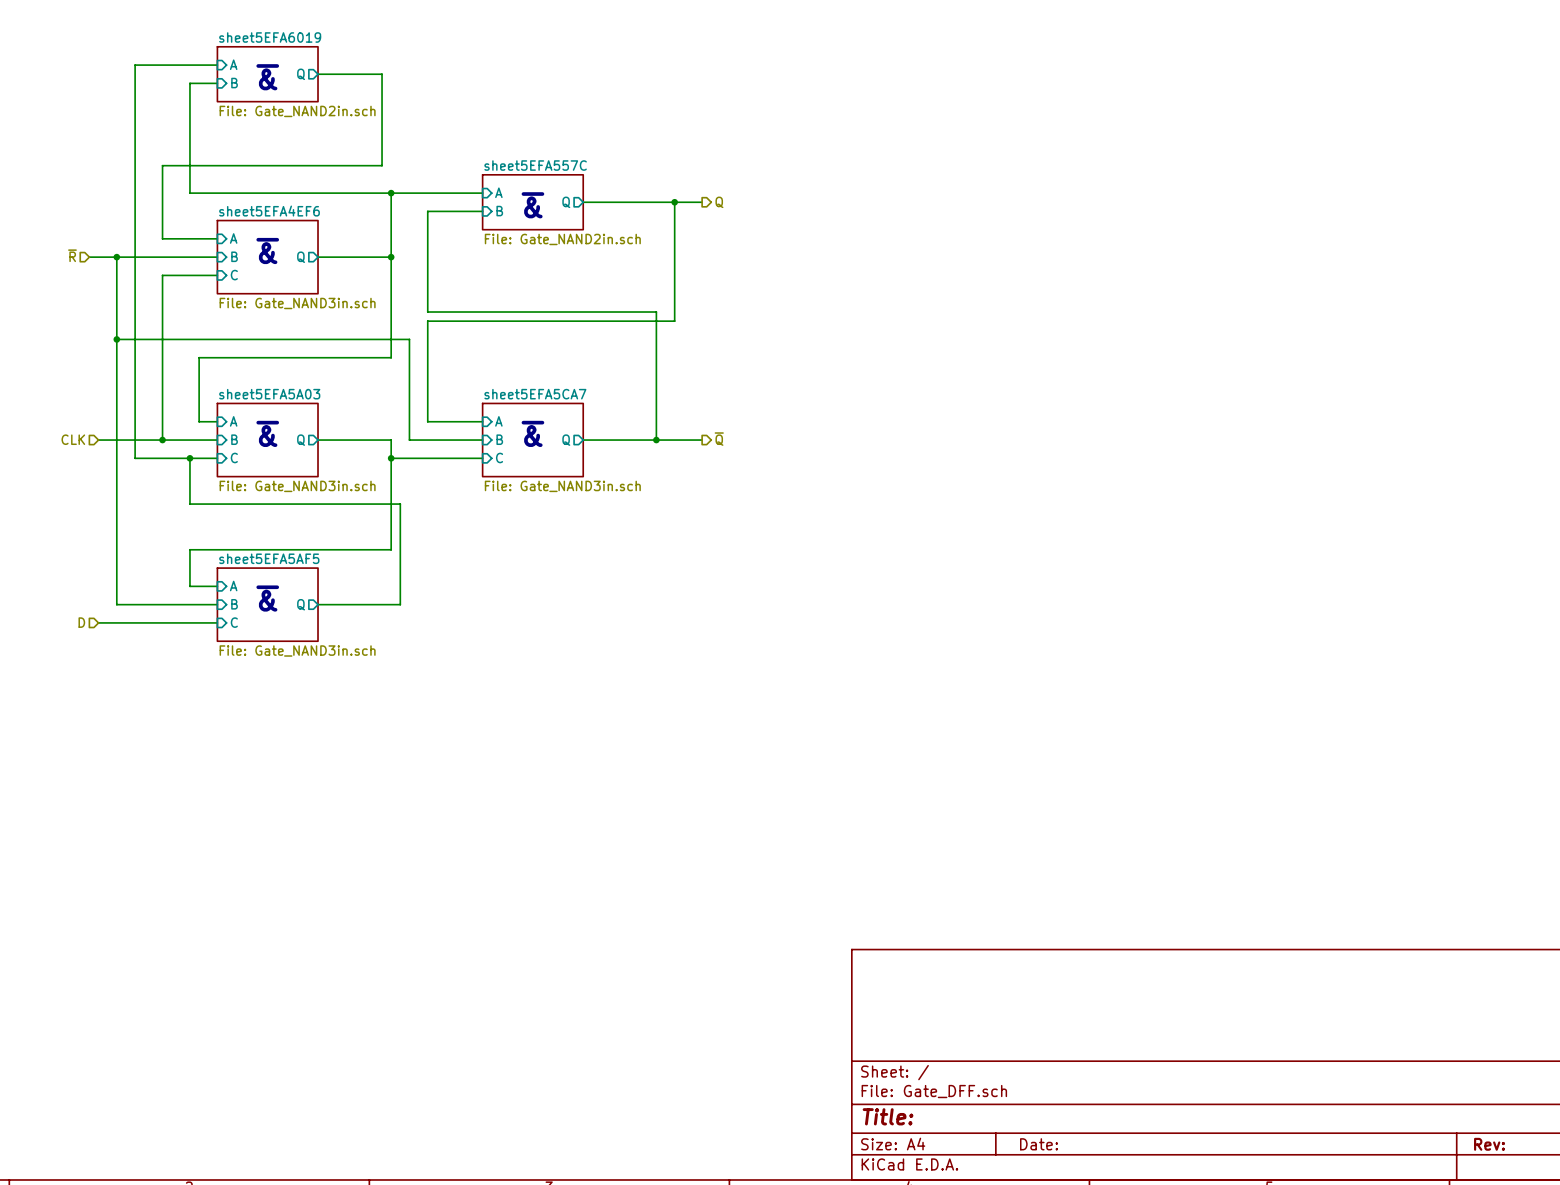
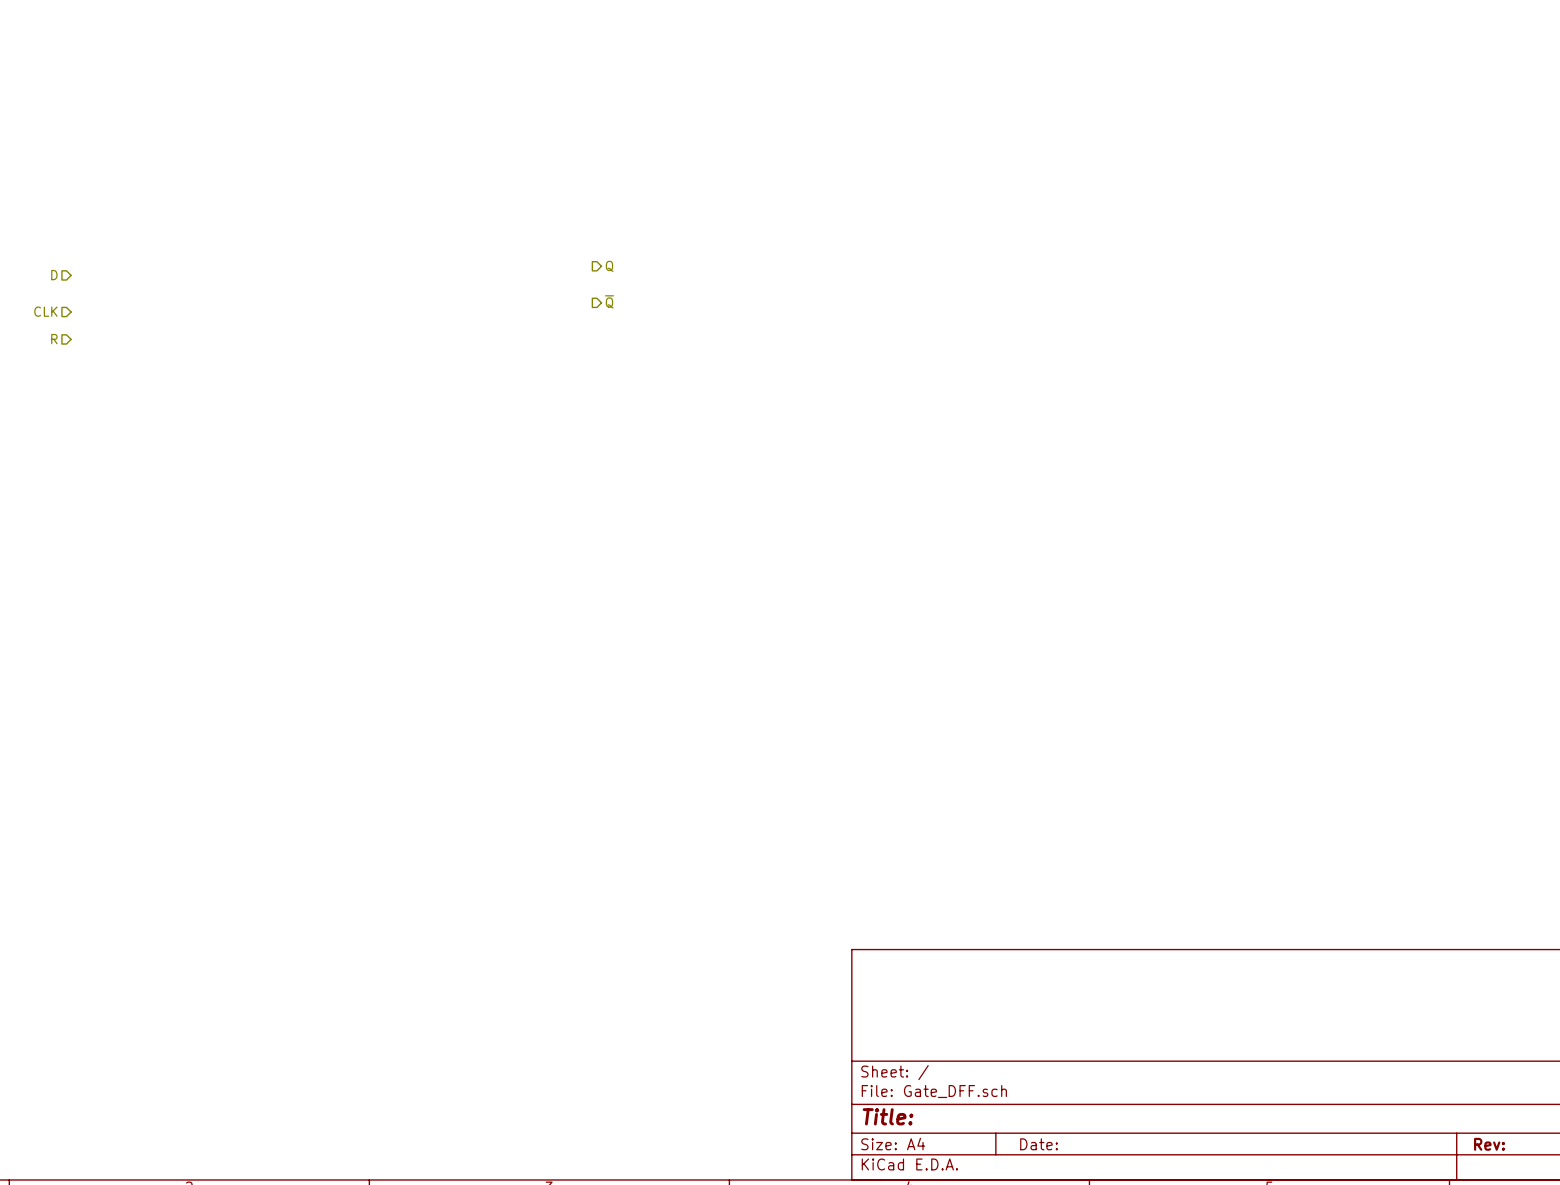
sheet pin: A (233, 64) -> none
wire: (217, 65) (135, 65) (135, 458) (217, 458) -> none
sheet sheet5EFA6019: File: Gate_NAND2in.sch (267, 74) -> none
sheet pin: Q (301, 74) -> none
wire: (318, 74) (382, 74) (382, 165) (162, 165) (162, 238) (217, 238) -> none
text: ~{&} (267, 77) -> none
wire: (217, 83) (189, 83) (189, 193) (482, 193) -> none
sheet pin: B (234, 83) -> none
sheet pin: A (498, 192) -> none
wire: (391, 193) (391, 357) (199, 357) (199, 421) (217, 421) -> none
junction: (391, 193) -> none
sheet sheet5EFA557C: File: Gate_NAND2in.sch (532, 202) -> none
sheet pin: Q (566, 202) -> none
wire: (583, 202) (702, 202) -> none
wire: (674, 202) (674, 321) (427, 321) (427, 421) (482, 421) -> none
junction: (674, 202) -> none
hierarchical label position: Q (719, 202) -> Q (609, 266)
text: ~{&} (532, 205) -> none
wire: (482, 211) (427, 211) (427, 312) (656, 312) (656, 440) -> none
sheet pin: B (499, 211) -> none
sheet pin: A (233, 238) -> none
text: ~{&} (267, 250) -> none
hierarchical label: ~{R} (72, 255) -> none
sheet pin: B (234, 256) -> none
wire: (89, 257) (217, 257) -> none
wire: (116, 257) (116, 604) (217, 604) -> none
junction: (116, 257) -> none
sheet sheet5EFA4EF6: File: Gate_NAND3in.sch (267, 257) -> none
sheet pin: Q (301, 257) -> none
wire: (318, 257) (391, 257) -> none
junction: (391, 257) -> none
hierarchical label: none -> D (54, 275)
wire: (217, 275) (162, 275) (162, 440) -> none
sheet pin: C (234, 275) -> none
hierarchical label: none -> R (54, 339)
wire: (116, 339) (409, 339) (409, 440) (482, 440) -> none
junction: (116, 339) -> none
sheet pin: A (233, 421) -> none
sheet pin: A (498, 421) -> none
text: ~{&} (267, 433) -> none
text: ~{&} (532, 433) -> none
hierarchical label position: CLK (73, 439) -> CLK (45, 311)
sheet pin: B (234, 439) -> none
sheet pin: B (499, 439) -> none
hierarchical label position: ~{Q} (719, 439) -> ~{Q} (609, 301)
wire: (98, 440) (217, 440) -> none
junction: (162, 440) -> none
sheet sheet5EFA5A03: File: Gate_NAND3in.sch (267, 440) -> none
sheet pin: Q (301, 440) -> none
wire: (318, 440) (391, 440) (391, 549) (189, 549) (189, 586) (217, 586) -> none
sheet sheet5EFA5CA7: File: Gate_NAND3in.sch (532, 440) -> none
sheet pin: Q (566, 440) -> none
wire: (583, 440) (702, 440) -> none
junction: (656, 440) -> none
sheet pin: C (234, 457) -> none
sheet pin: C (499, 457) -> none
wire: (189, 458) (189, 504) (400, 504) (400, 604) (318, 604) -> none
junction: (189, 458) -> none
wire: (391, 458) (482, 458) -> none
junction: (391, 458) -> none
sheet pin: A (233, 586) -> none
text: ~{&} (267, 598) -> none
sheet pin: B (234, 604) -> none
sheet sheet5EFA5AF5: File: Gate_NAND3in.sch (267, 604) -> none
sheet pin: Q (301, 604) -> none
hierarchical label: D (81, 622) -> none
wire: (98, 622) (217, 622) -> none
sheet pin: C (234, 622) -> none

